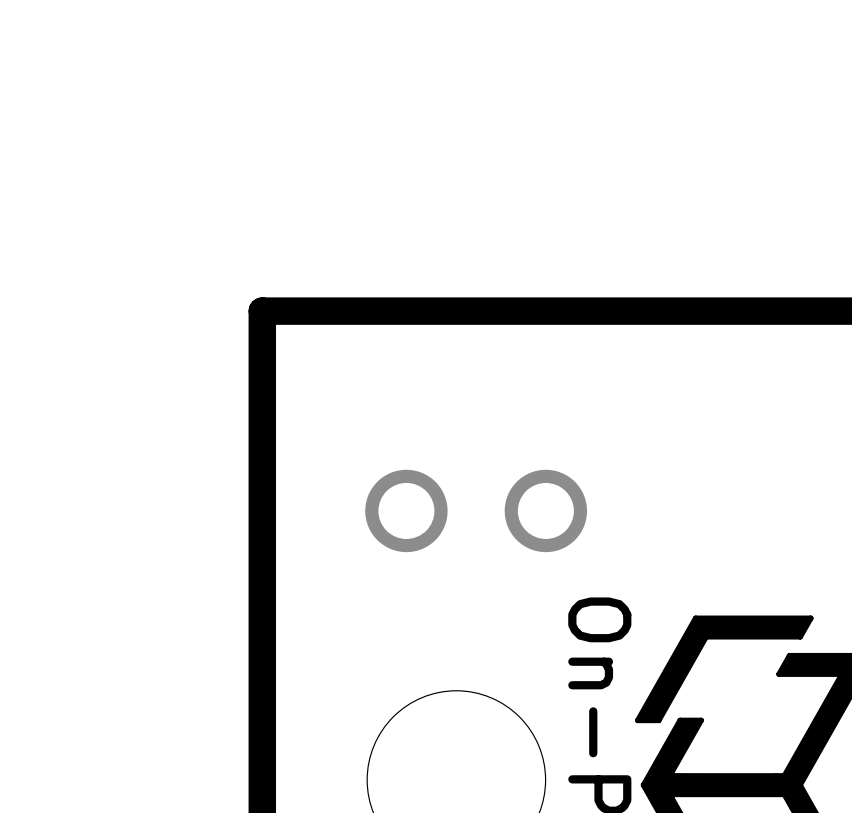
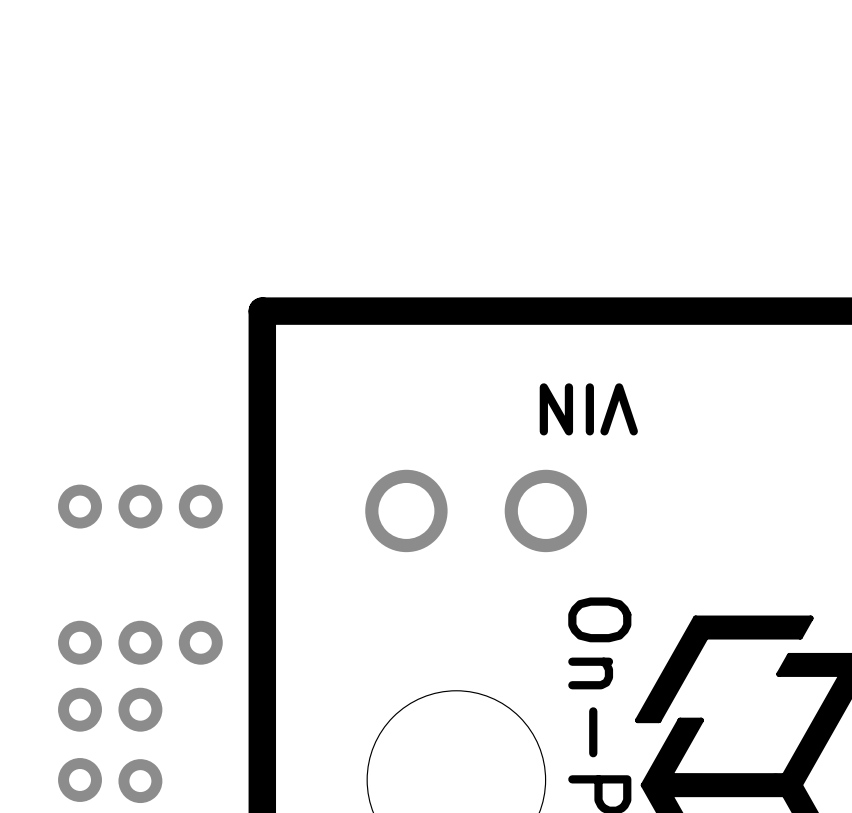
text: none -> VIN (588, 409)
via: none -> (80, 506)
via: none -> (140, 506)
via: none -> (200, 506)
via: none -> (80, 642)
via: none -> (140, 642)
via: none -> (200, 642)
via: none -> (80, 709)
via: none -> (140, 709)
via: none -> (80, 779)
via: none -> (140, 781)

